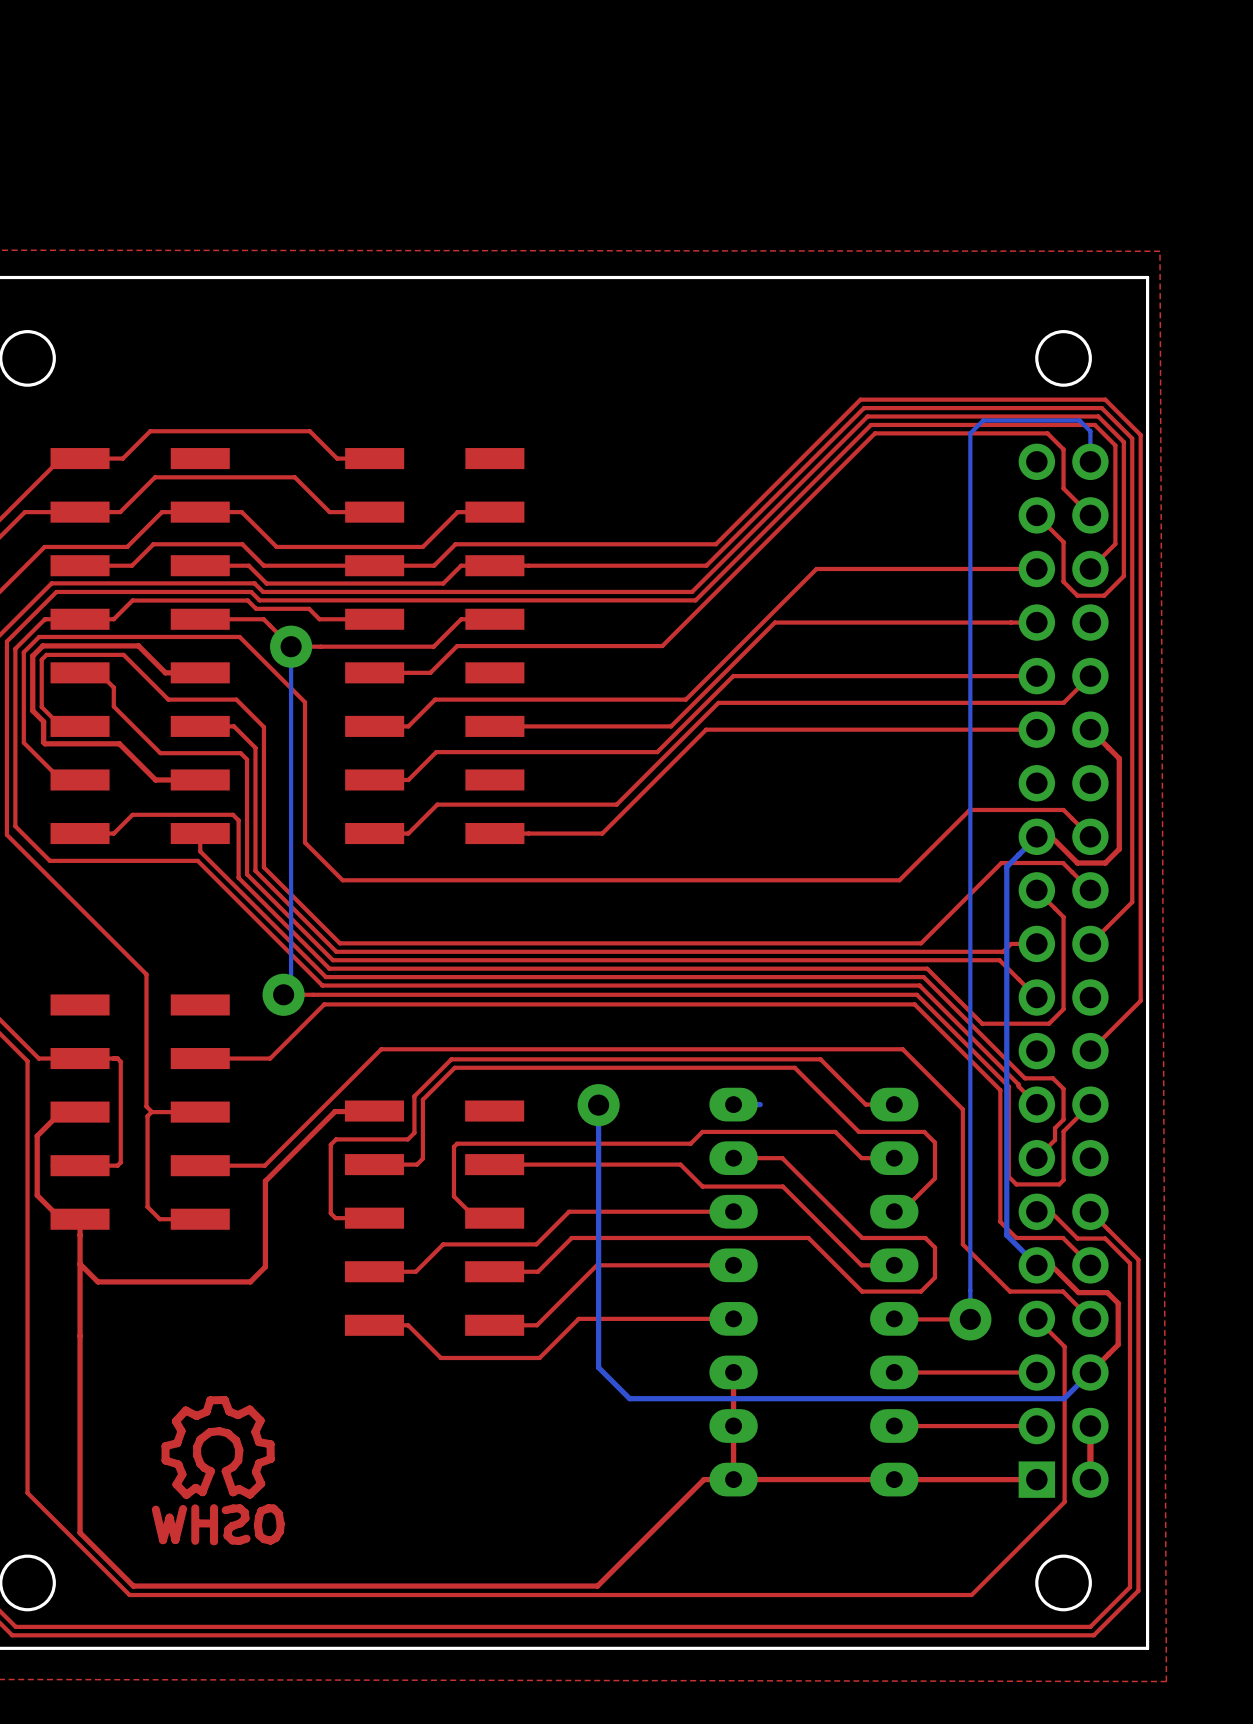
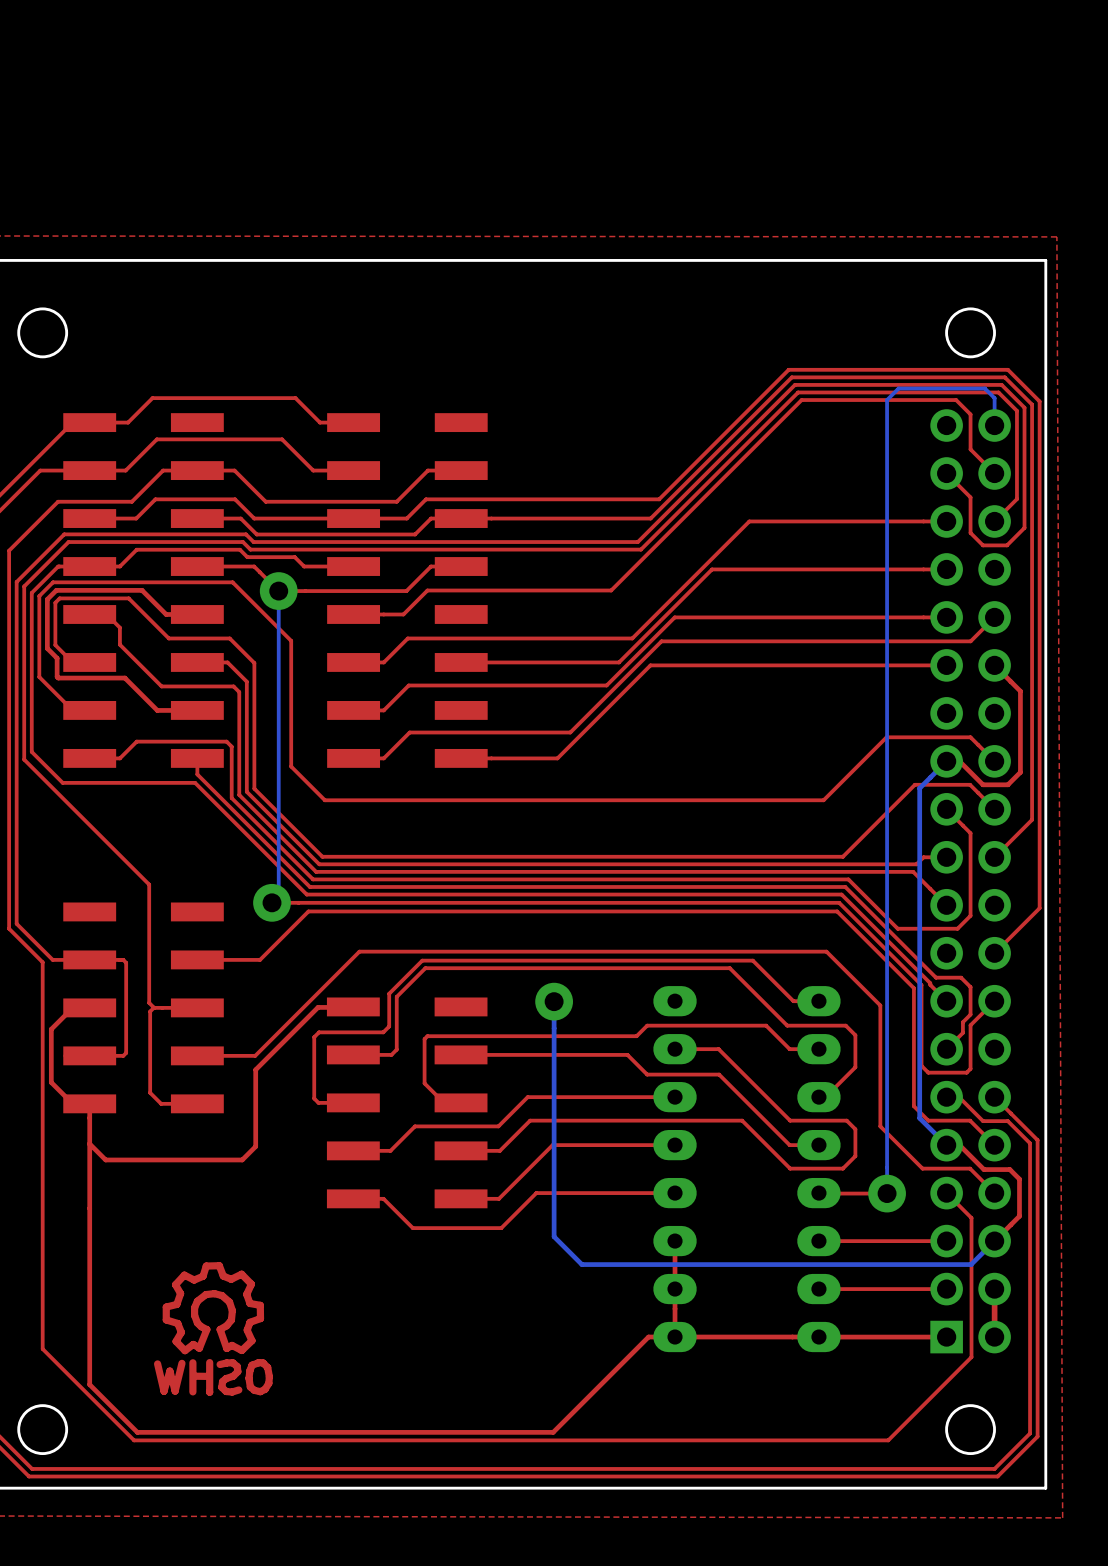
bottom track: (760, 1104) (752, 1104) -> none

